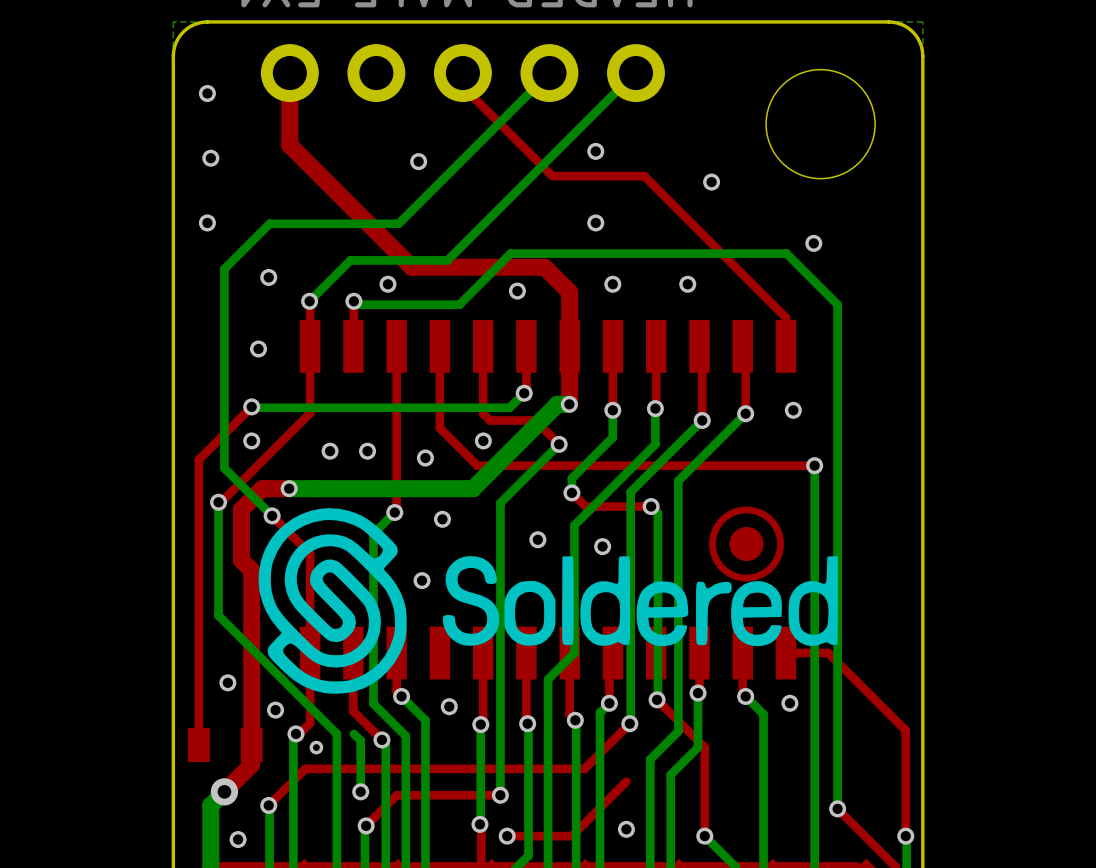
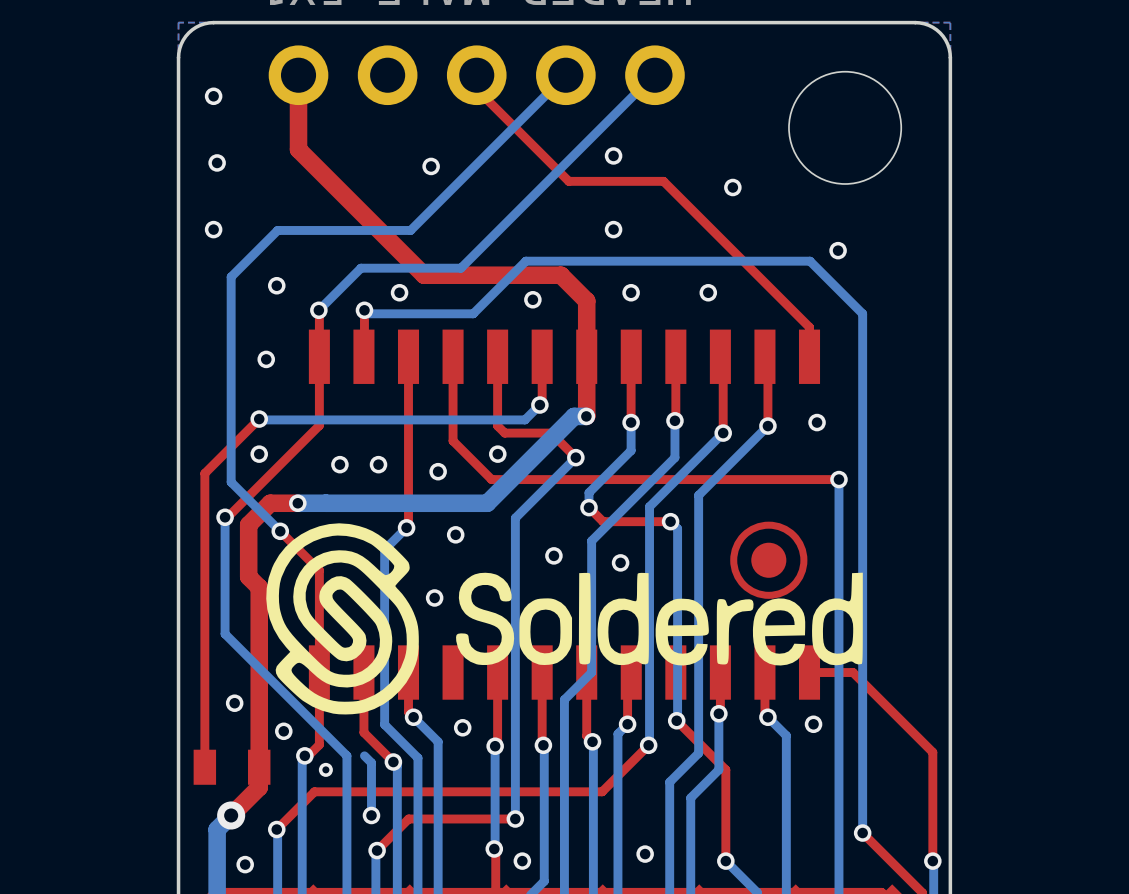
top track: (626, 781) (571, 836) (507, 836) -> none

